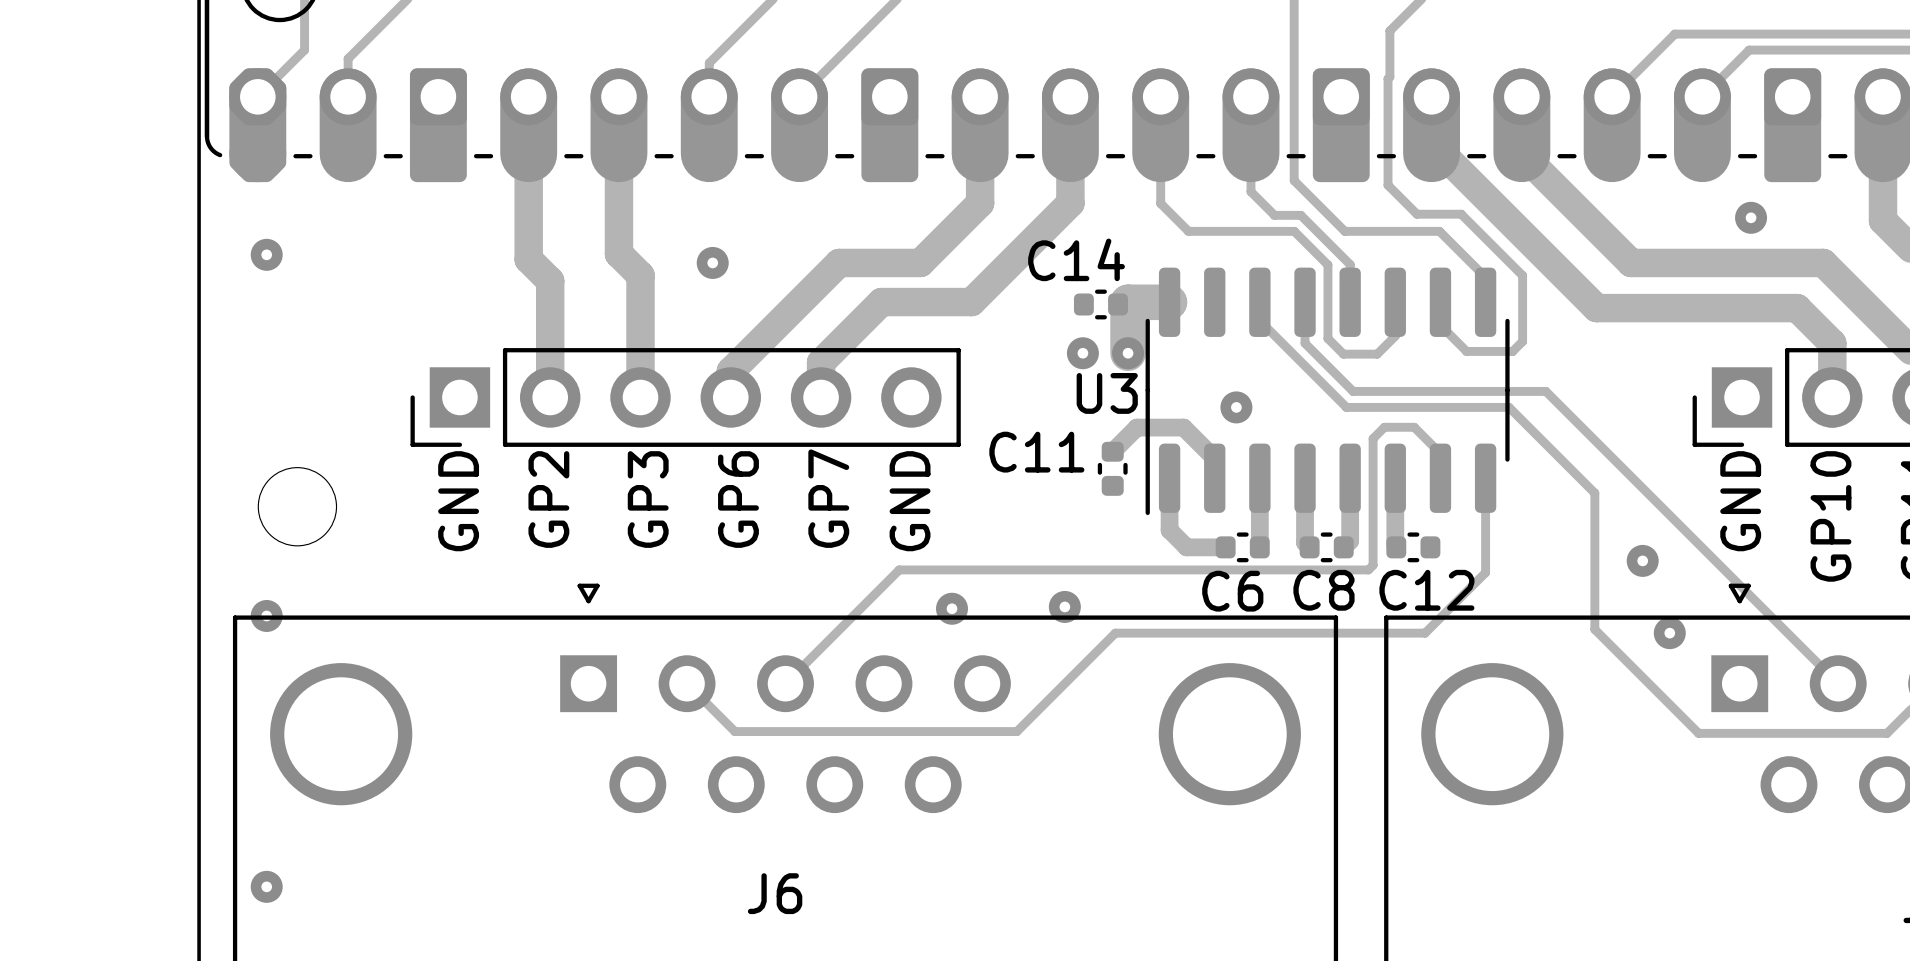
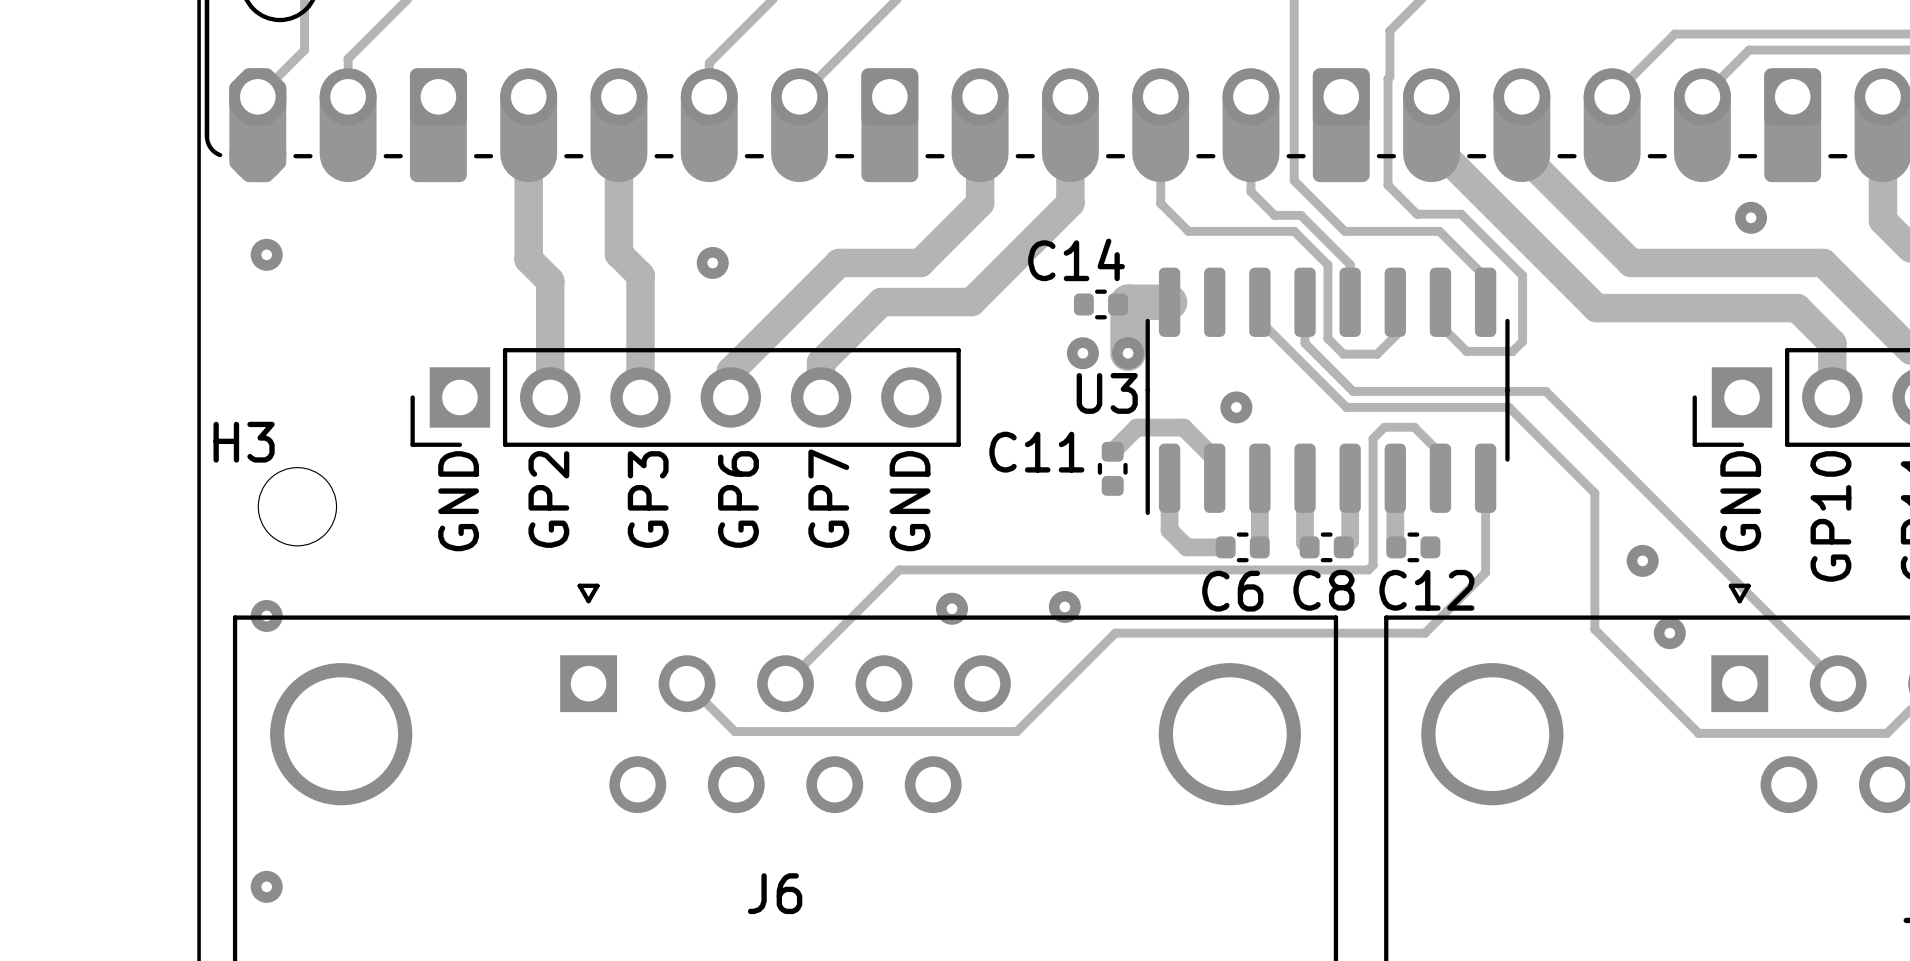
H3 name: none -> H3 (244, 442)

